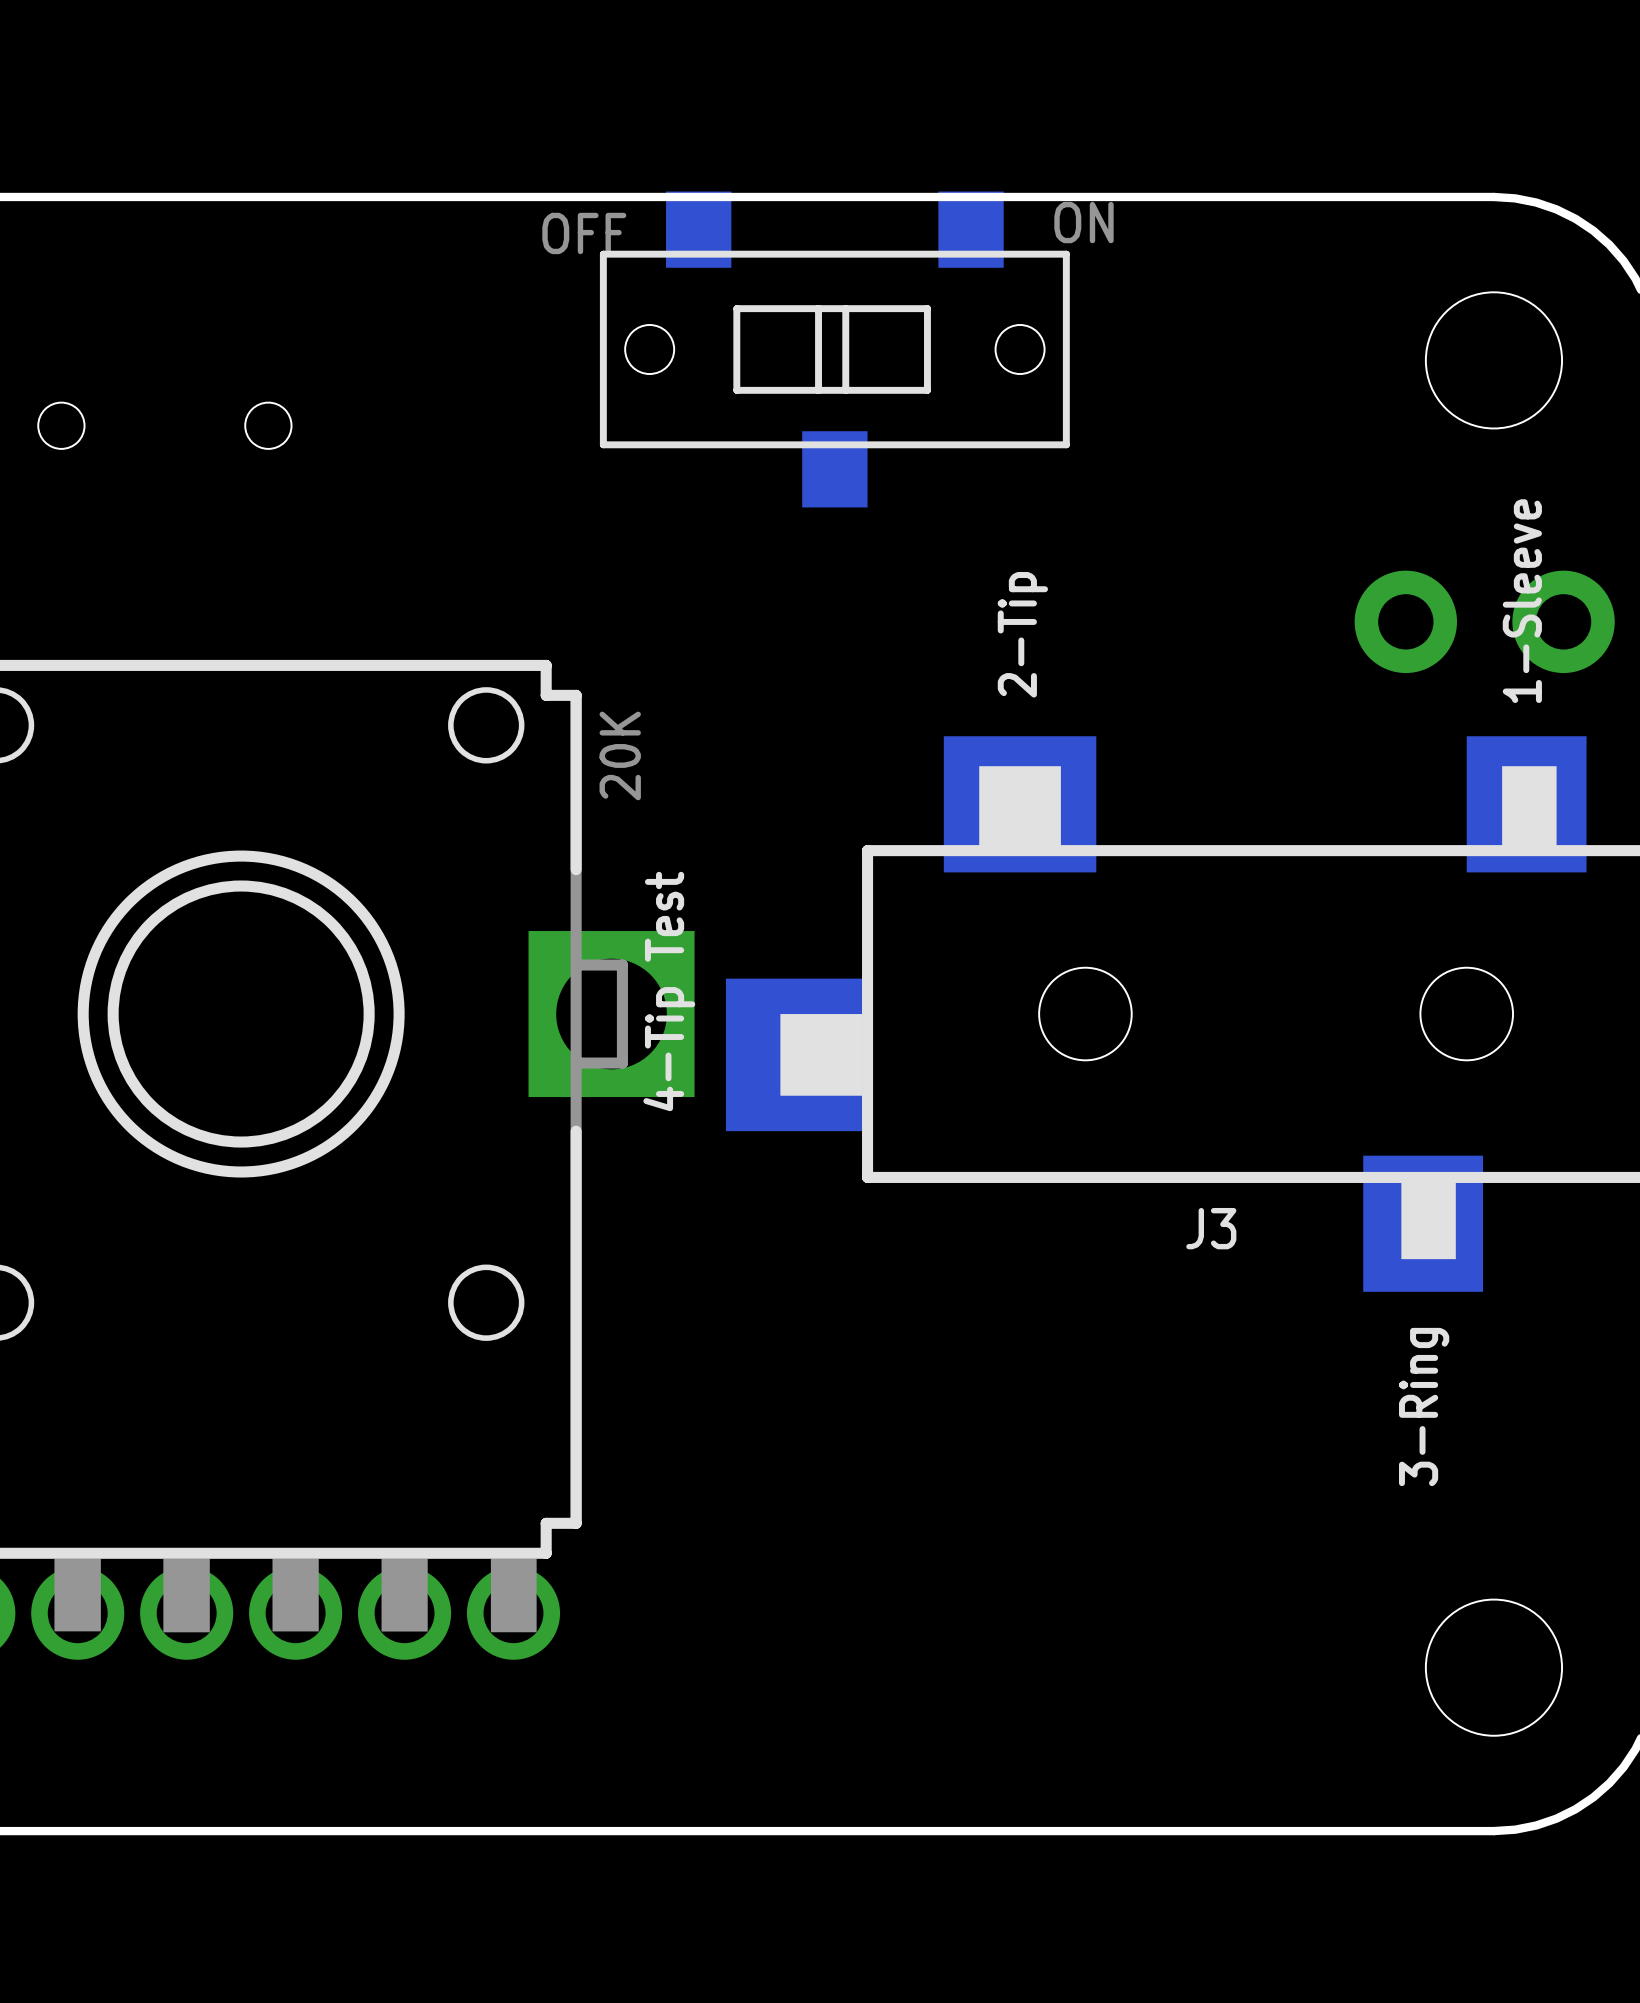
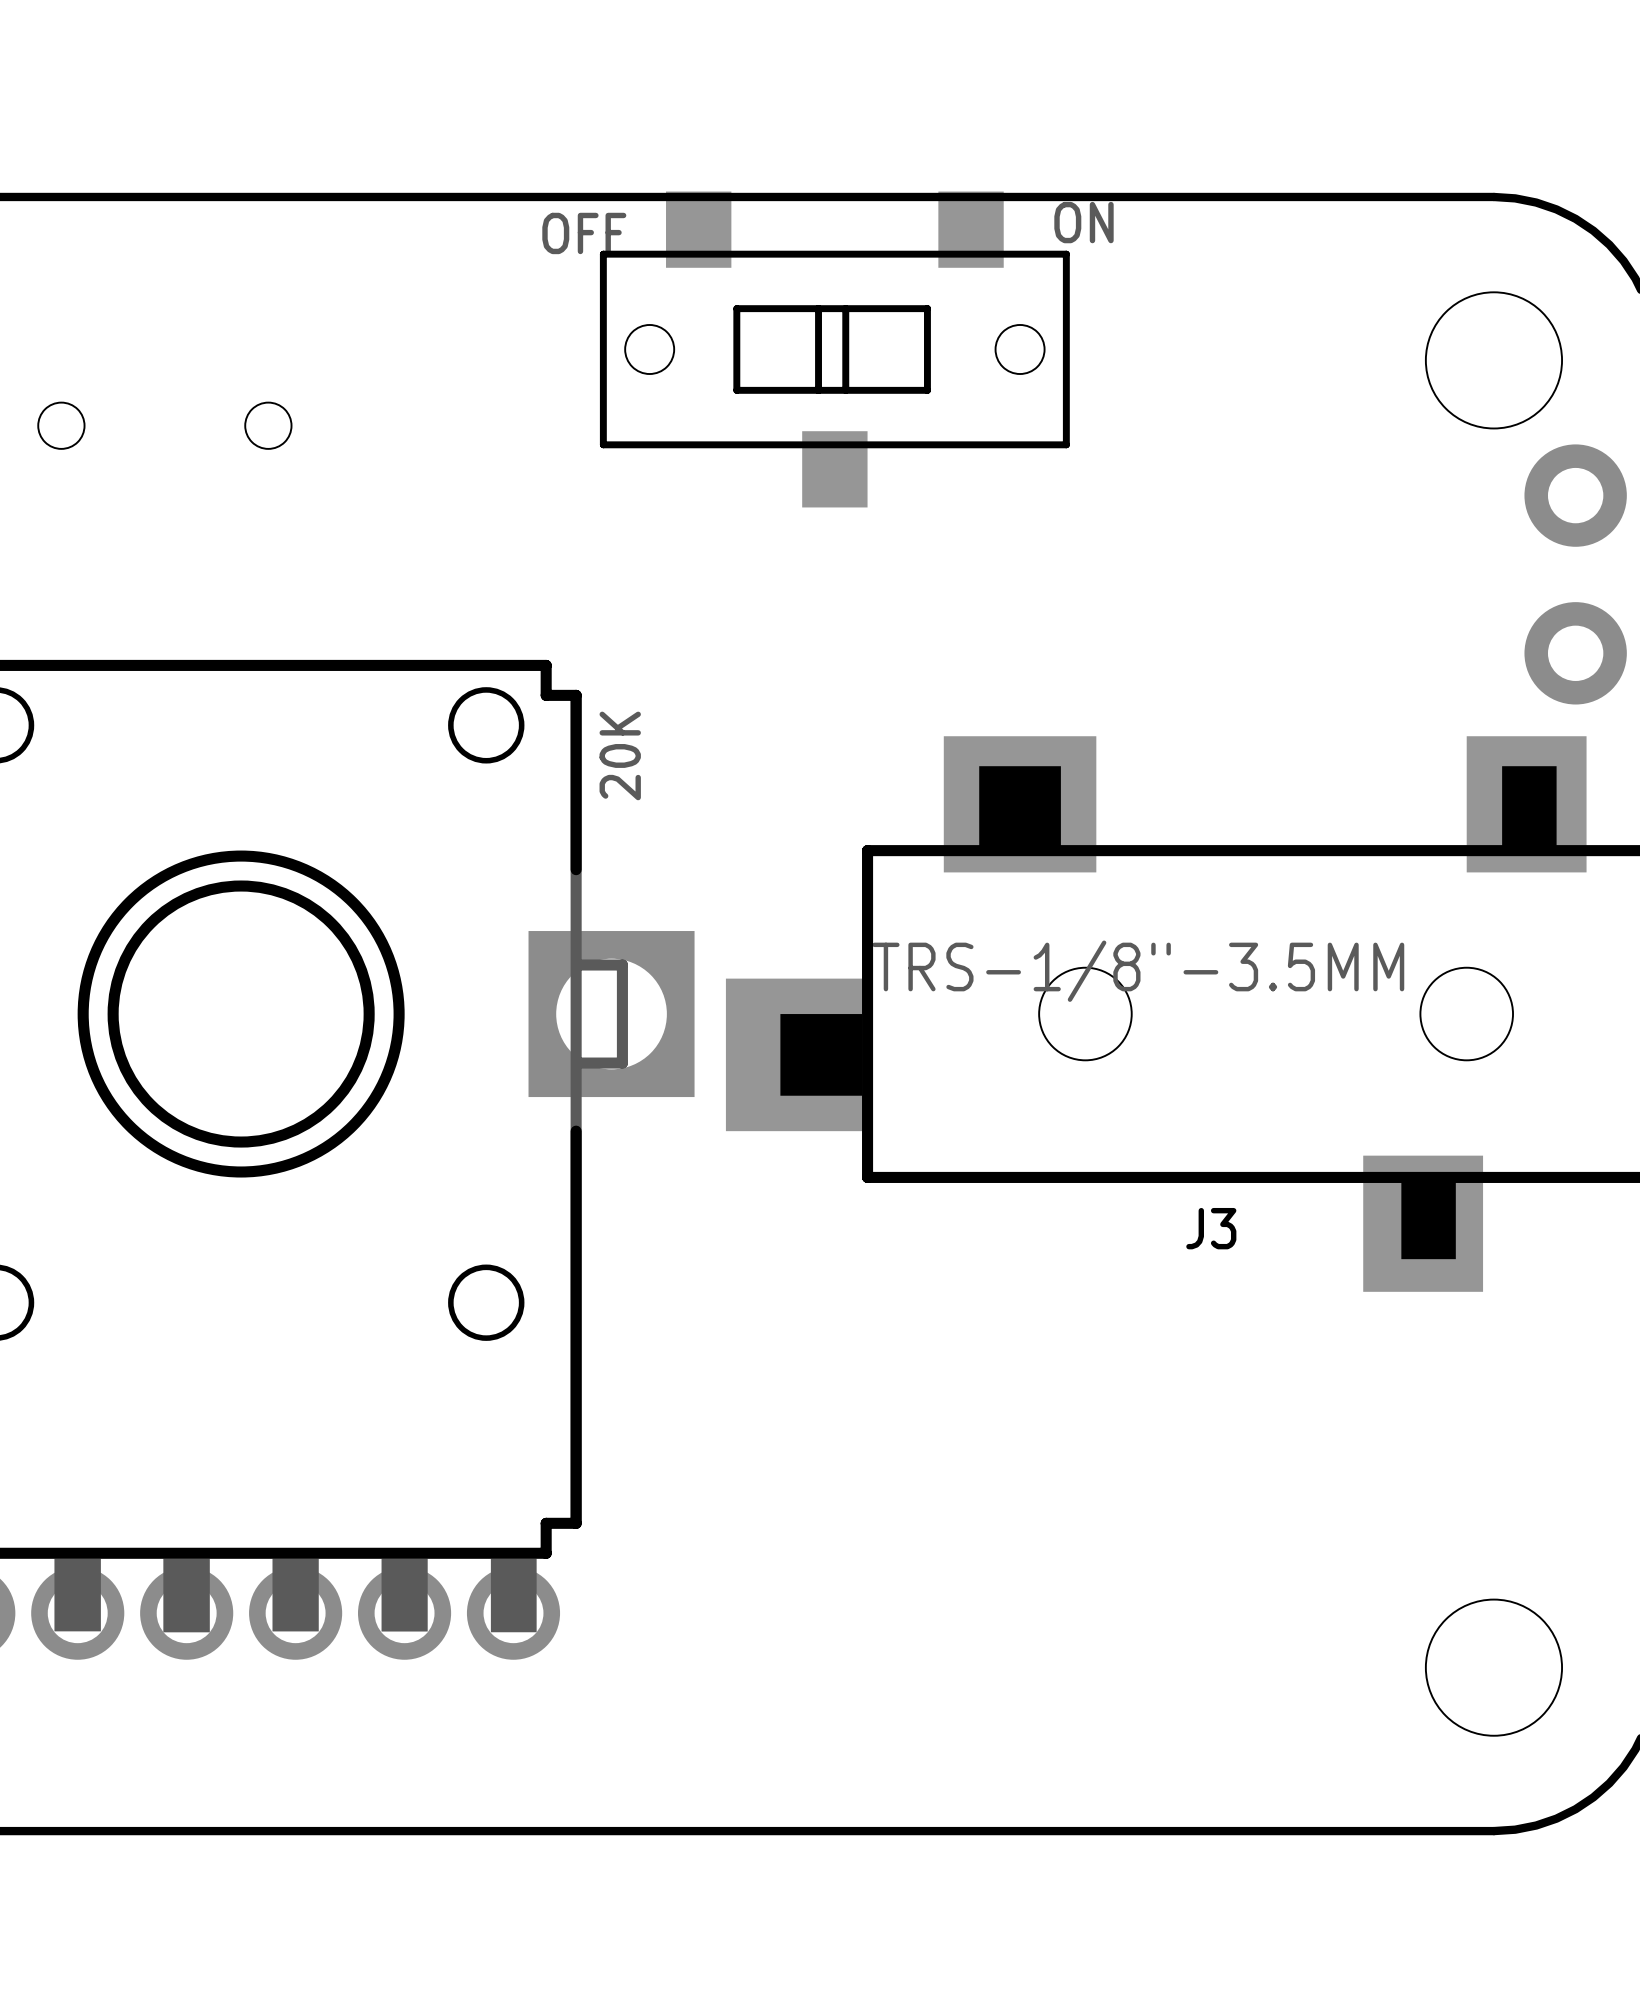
J3 text: 1-Sleeve (1522, 601) -> none
part rotation: 0° (1484, 621) -> 90° clockwise (1575, 574)
J3 text: 2-Tip (1022, 634) -> none
J3 value: none -> TRS-1/8"-3.5MM (1138, 971)
J3 text: 4-Tip Test (669, 991) -> none
J3 text: 3-Ring (1424, 1407) -> none

